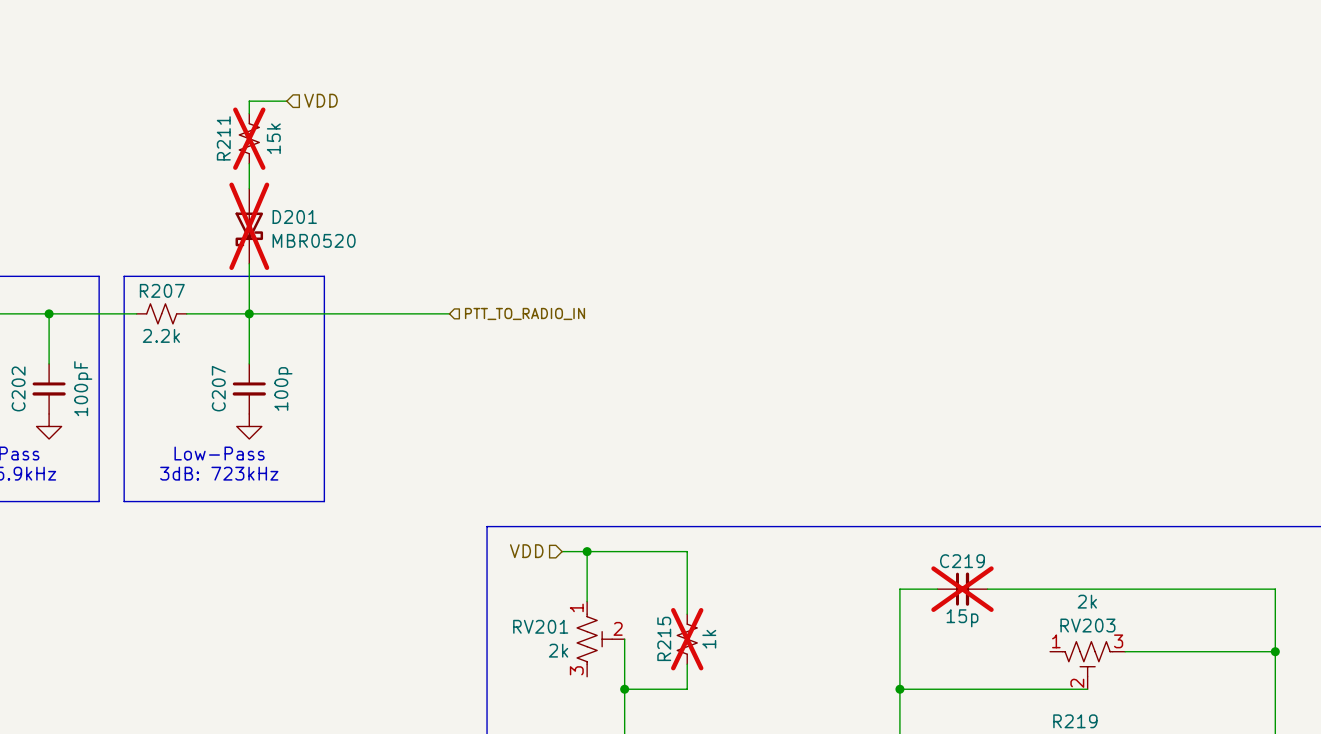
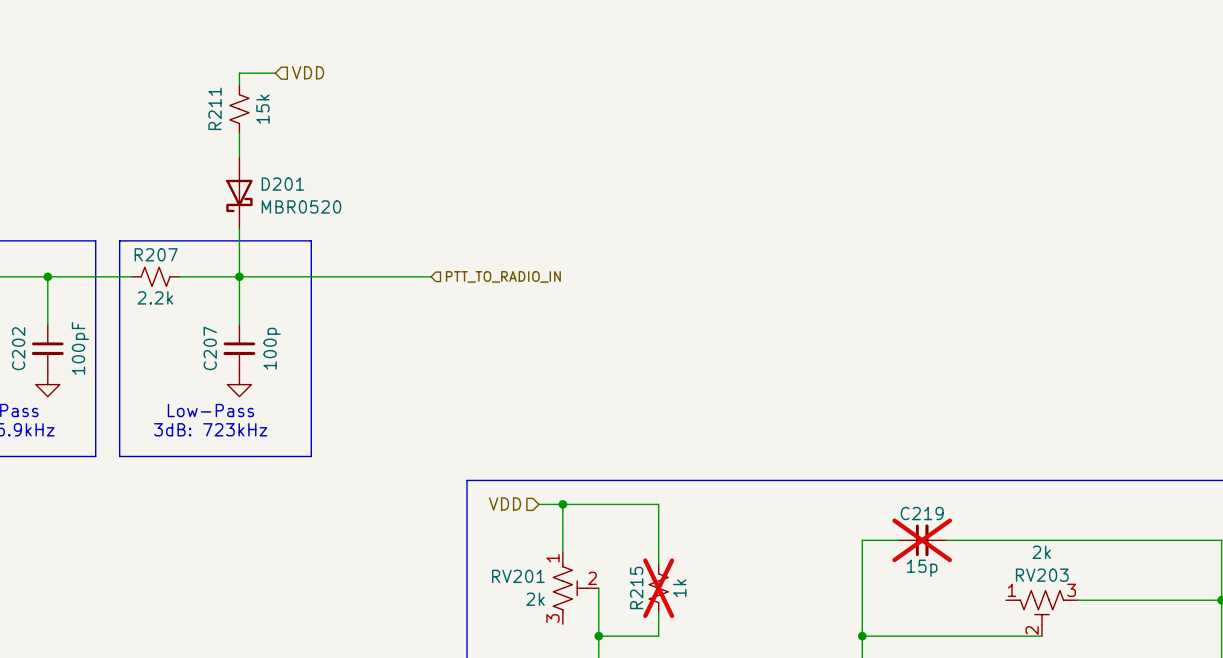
R211 do-not-place cross: (249, 138) -> none
D201 do-not-place cross: (249, 226) -> none

